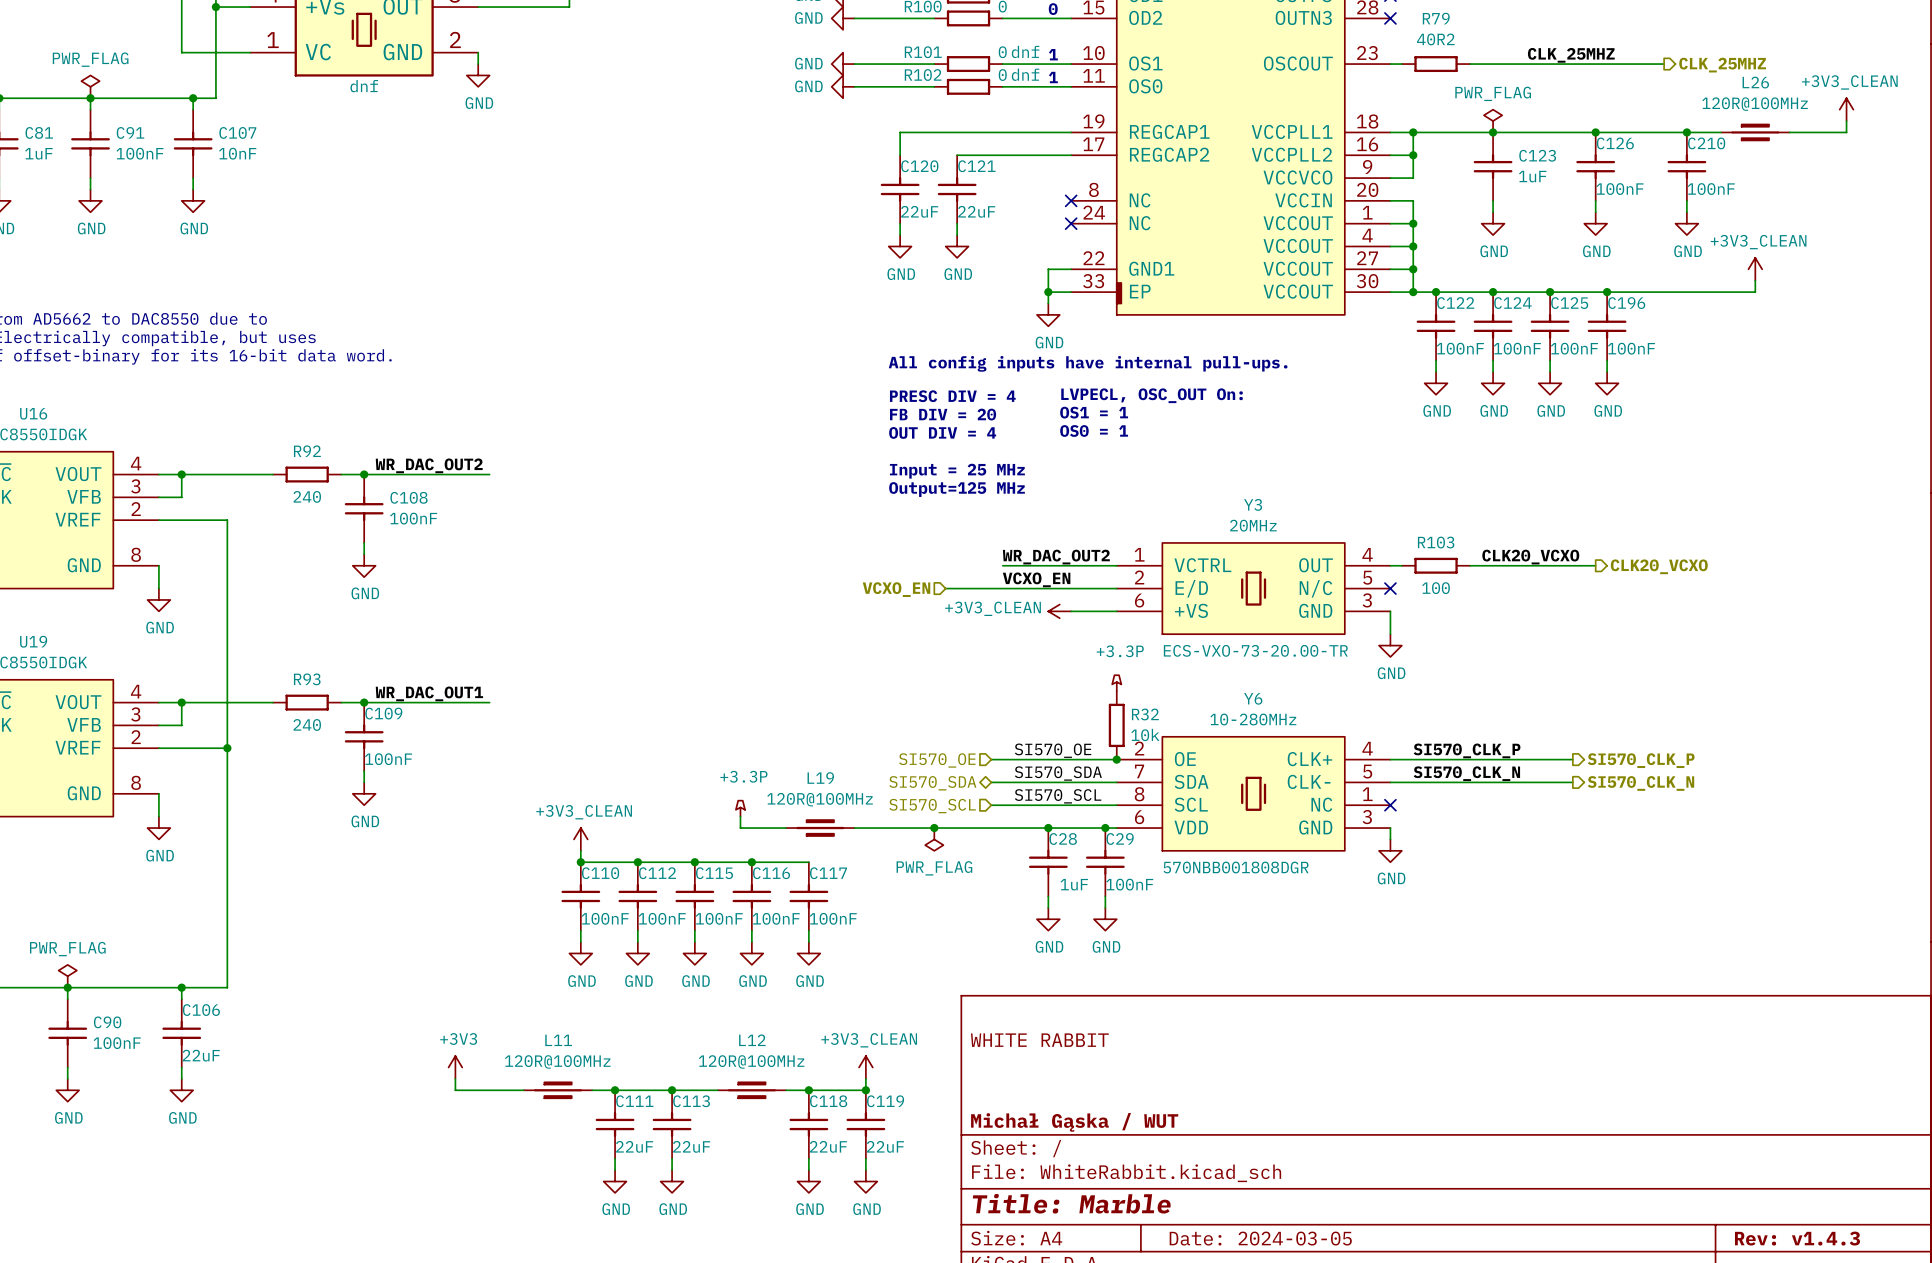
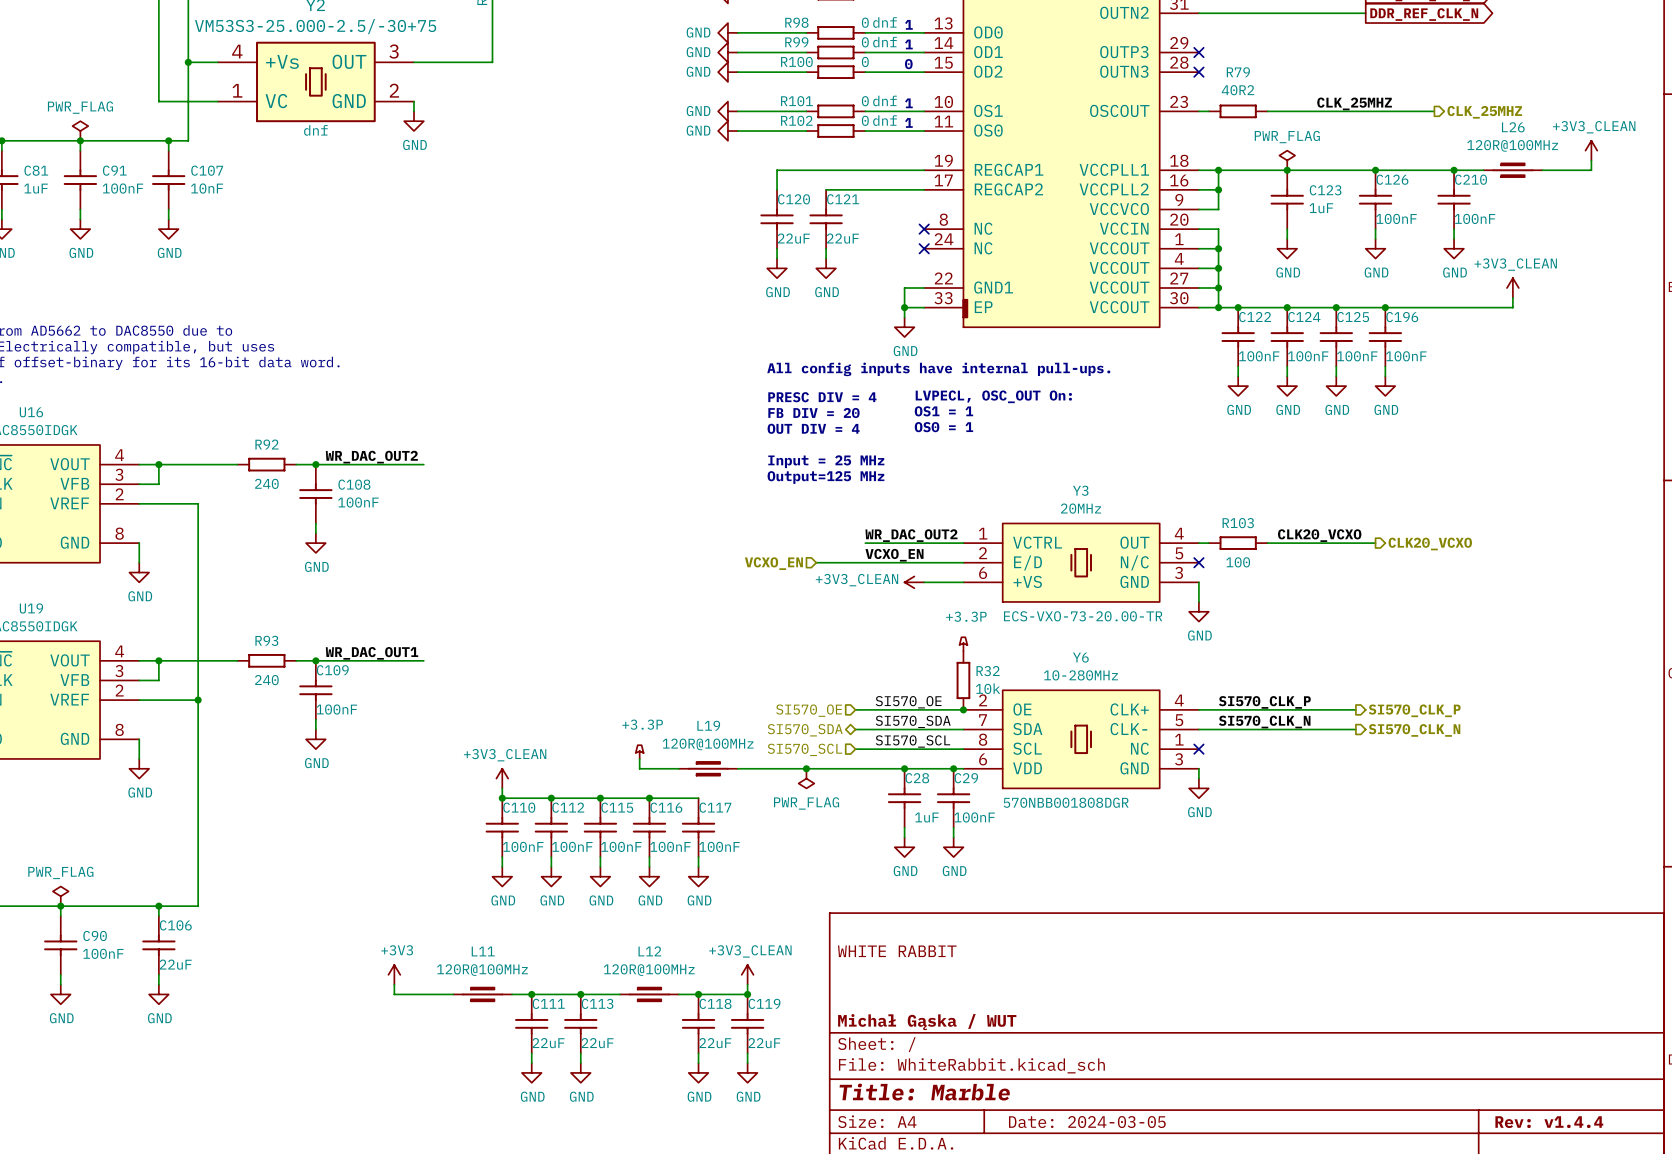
title block: Rev: v1.4.3 (1797, 1238) -> Rev: v1.4.4 (1549, 1122)

